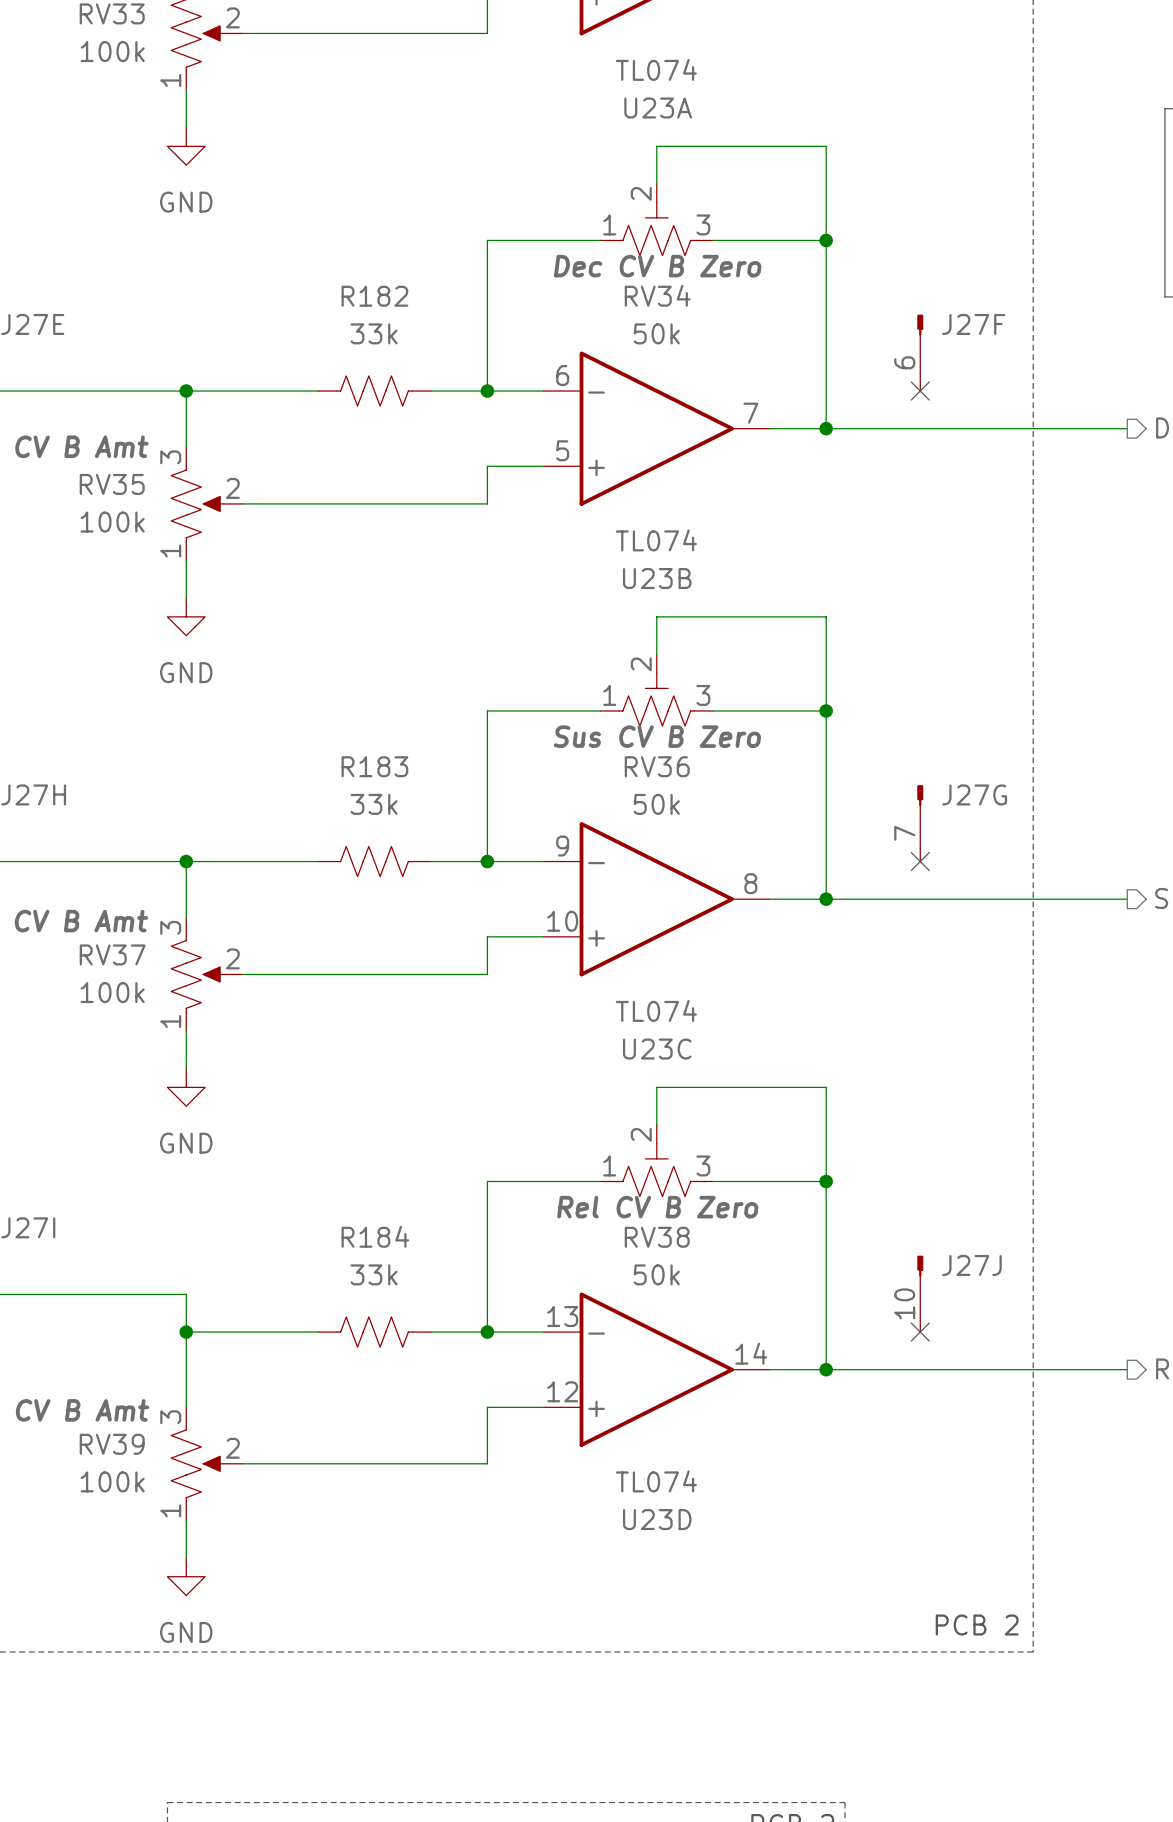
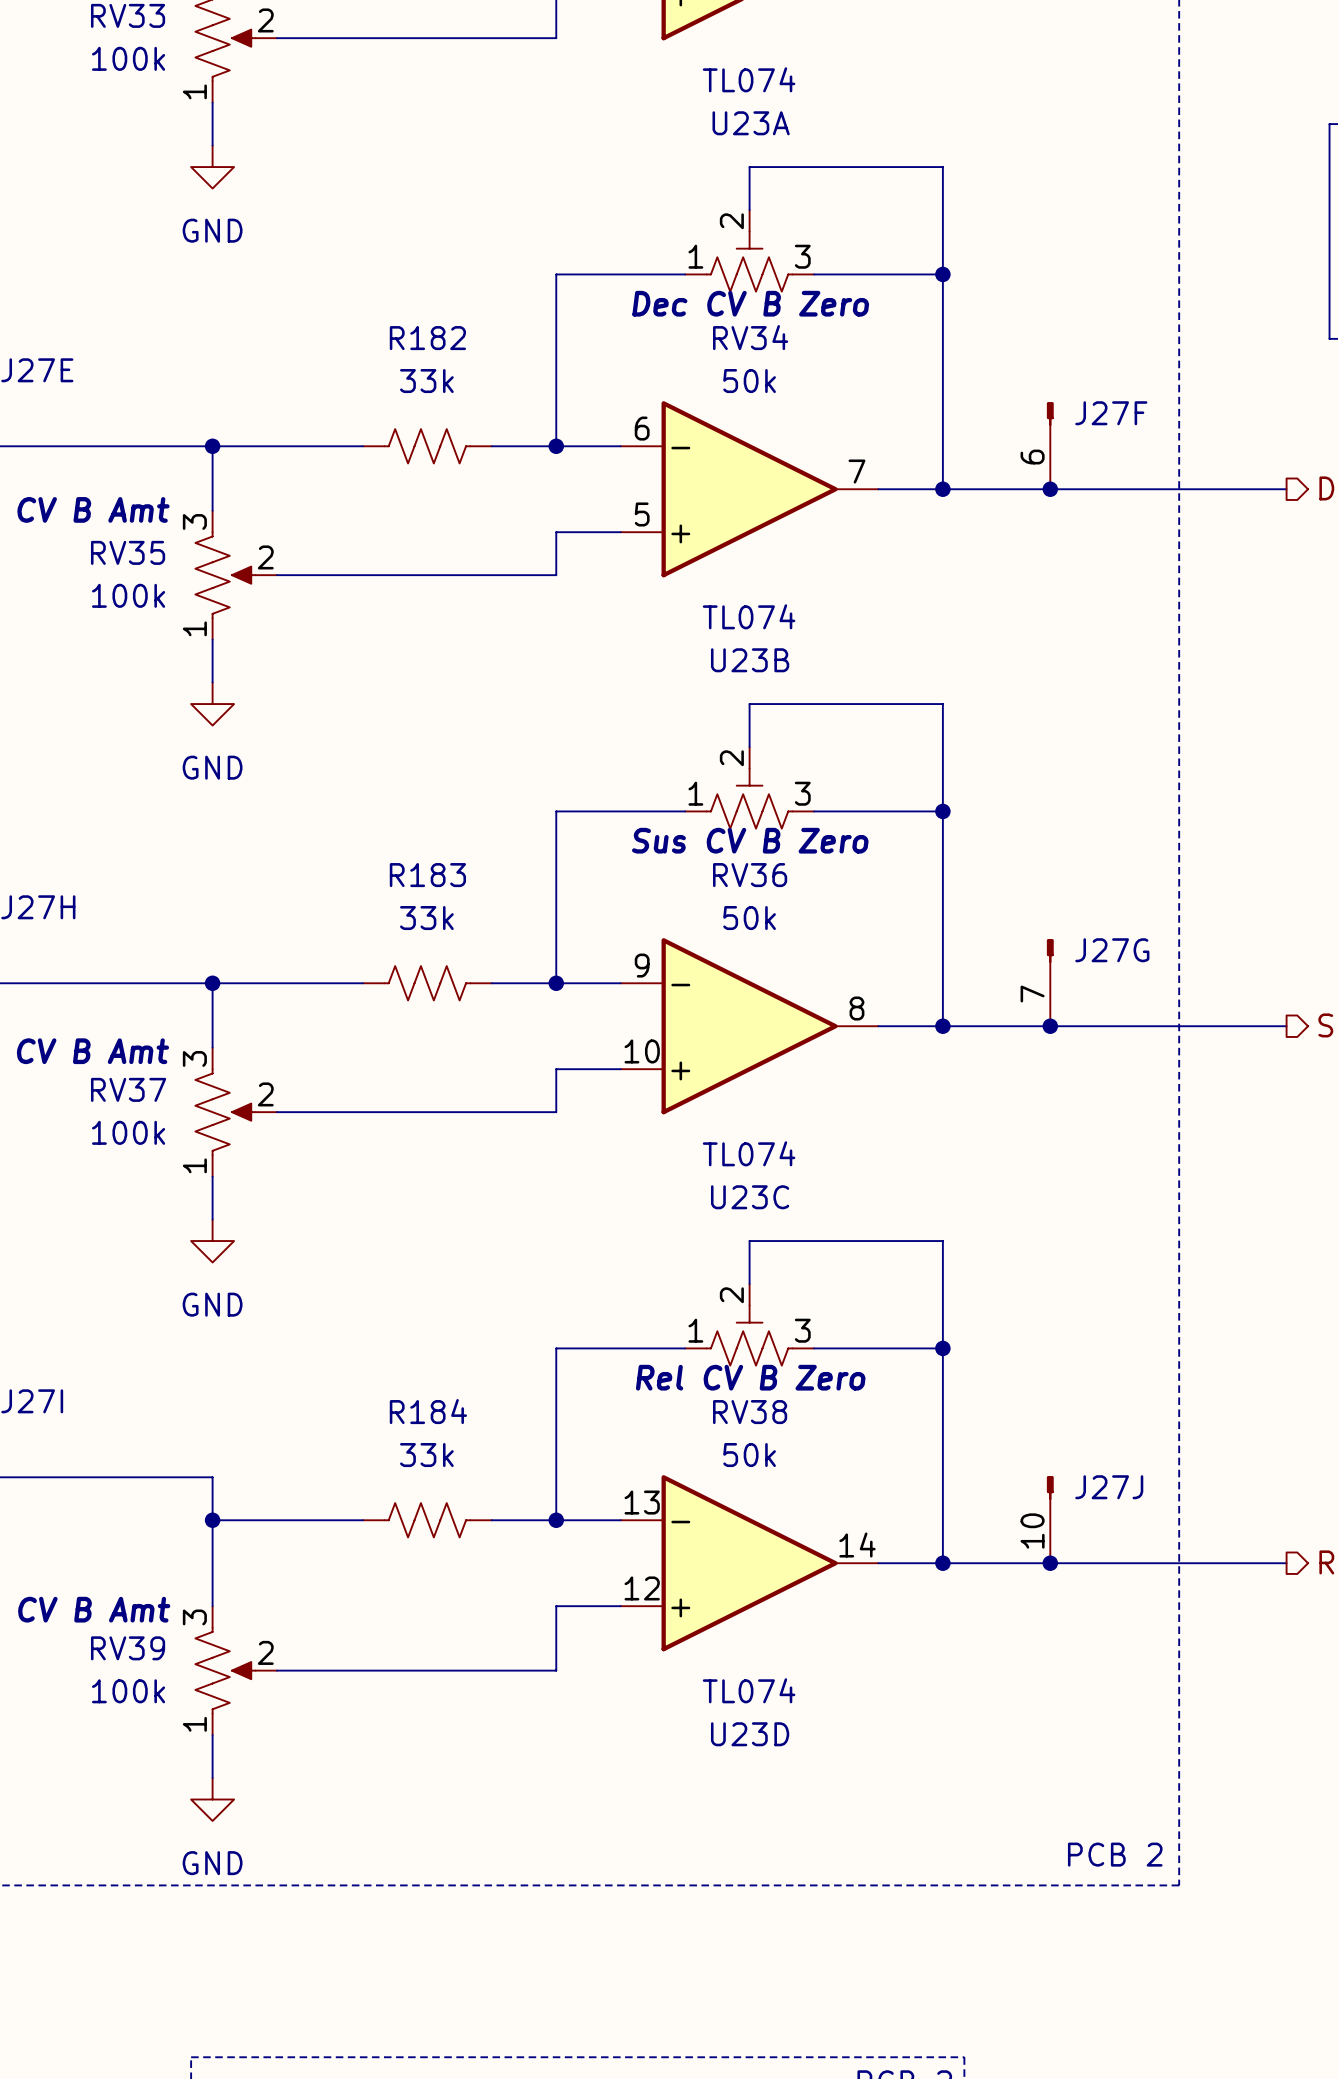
J27F position: (920, 352) -> (1050, 445)
no-connect mark: (920, 391) -> none
junction: none -> (1050, 489)
J27G position: (920, 823) -> (1050, 982)
no-connect mark: (920, 861) -> none
junction: none -> (1050, 1026)
J27J position: (920, 1293) -> (1050, 1519)
no-connect mark: (920, 1332) -> none
junction: none -> (1050, 1563)

